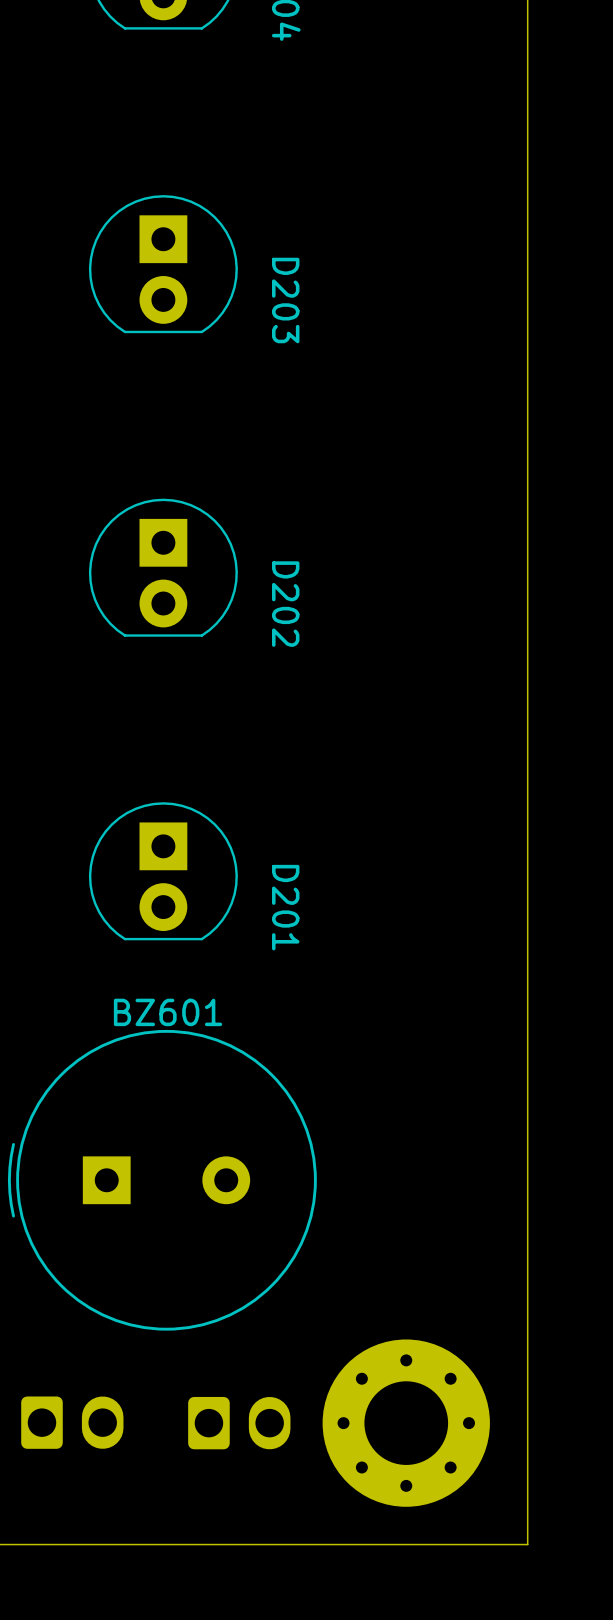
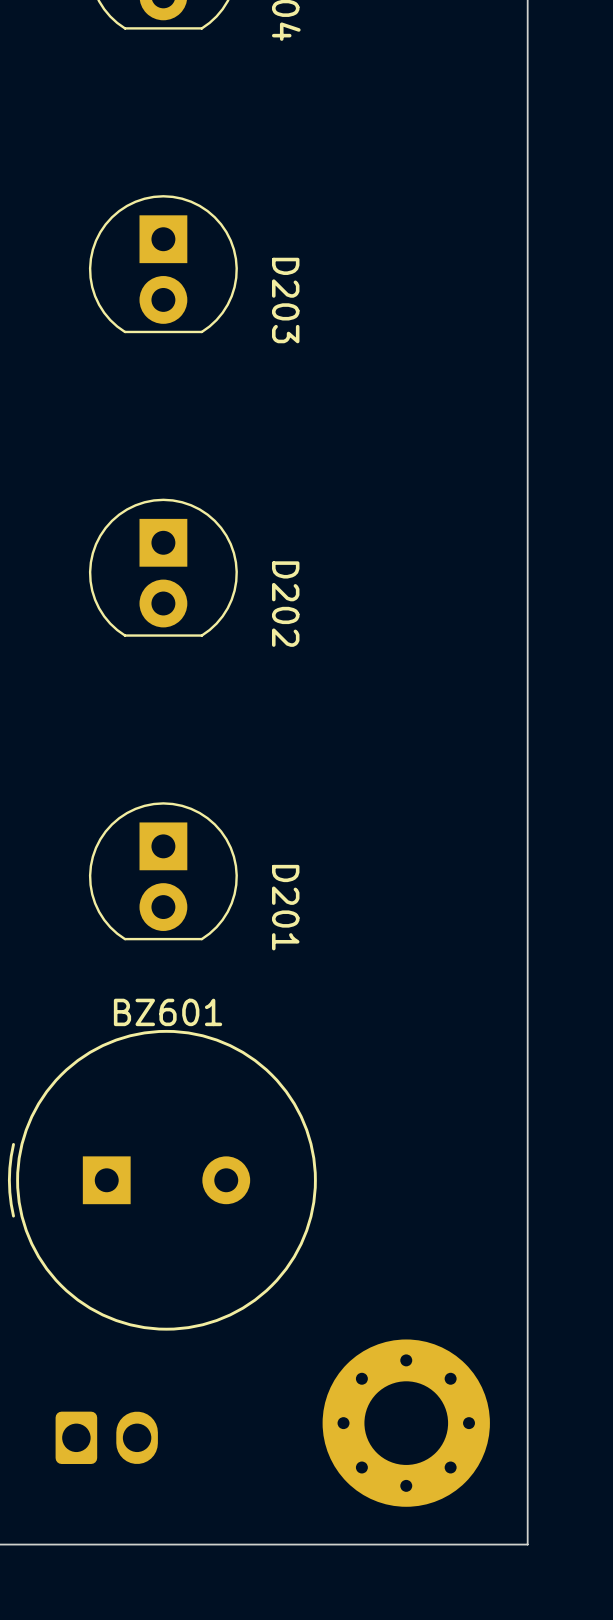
part position: (72, 1422) -> (106, 1437)
part: (239, 1423) -> none

